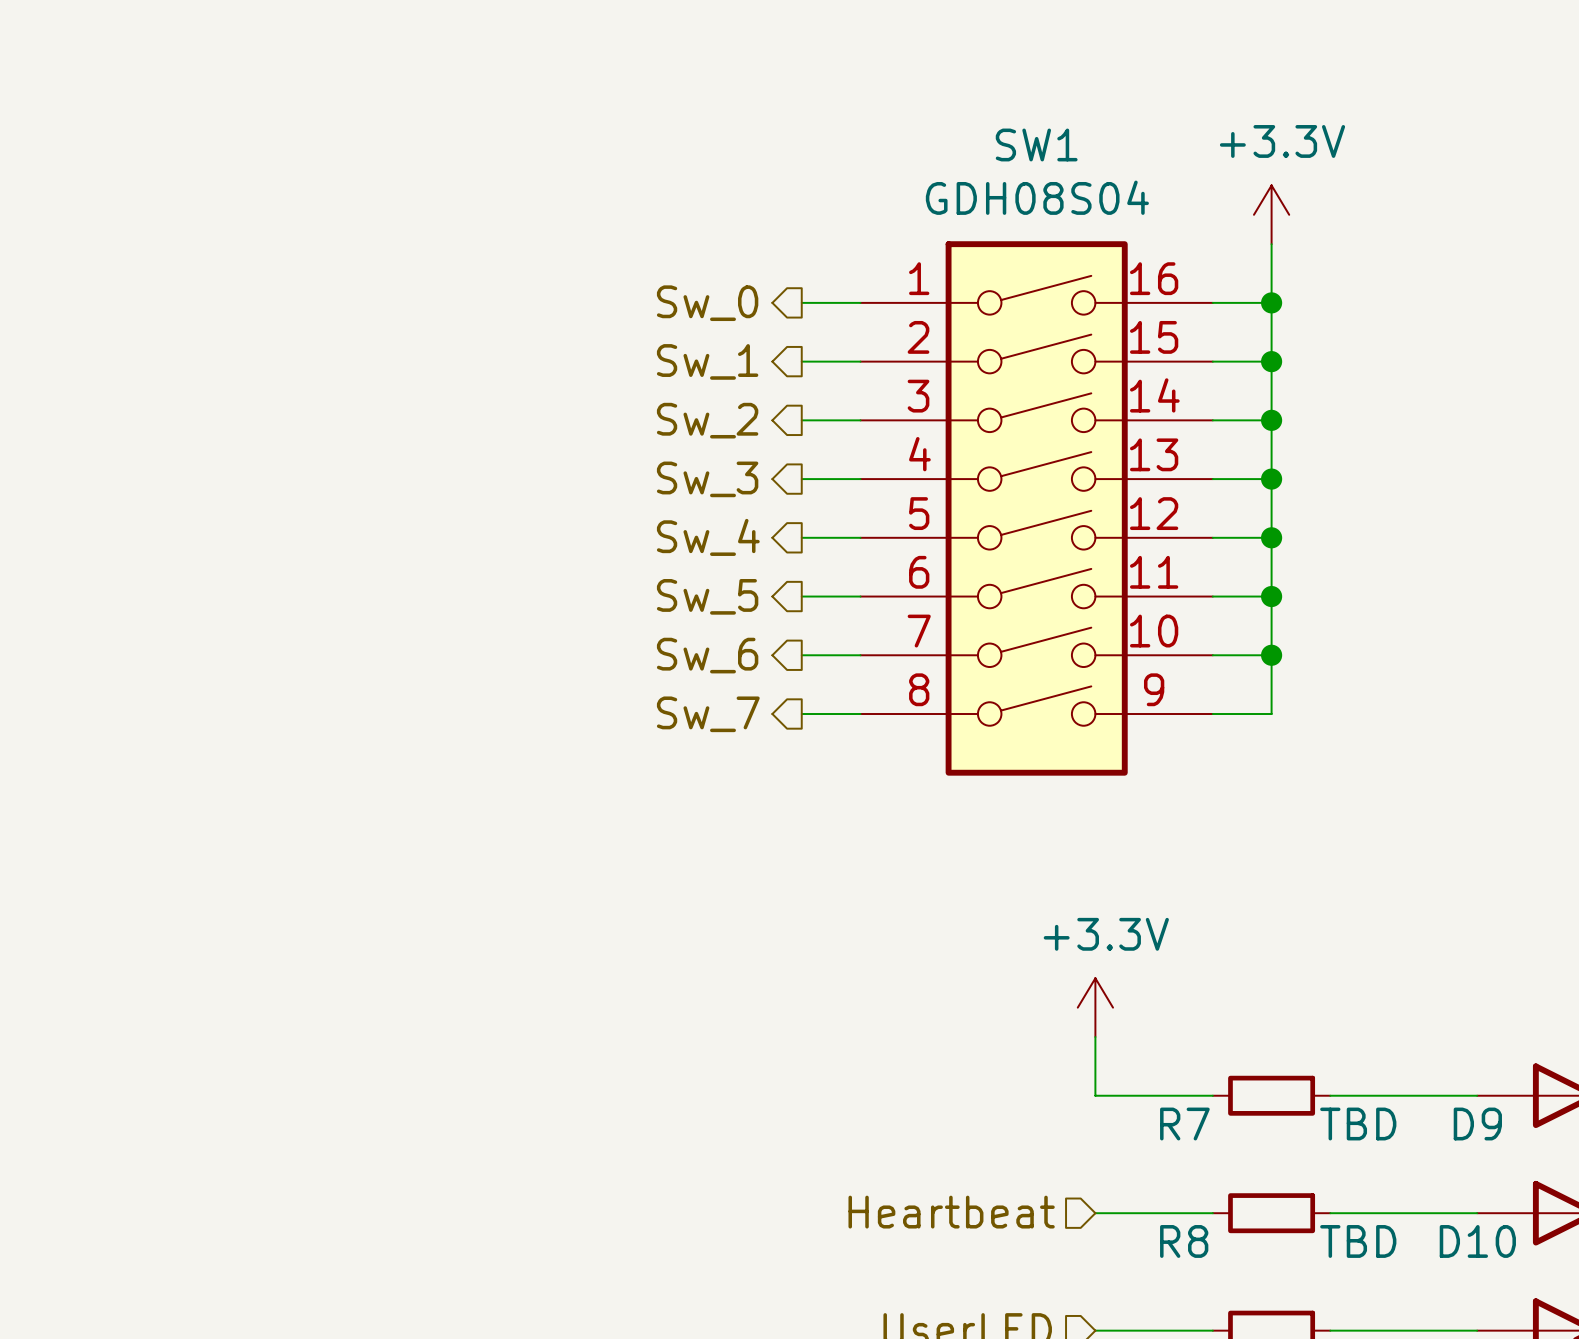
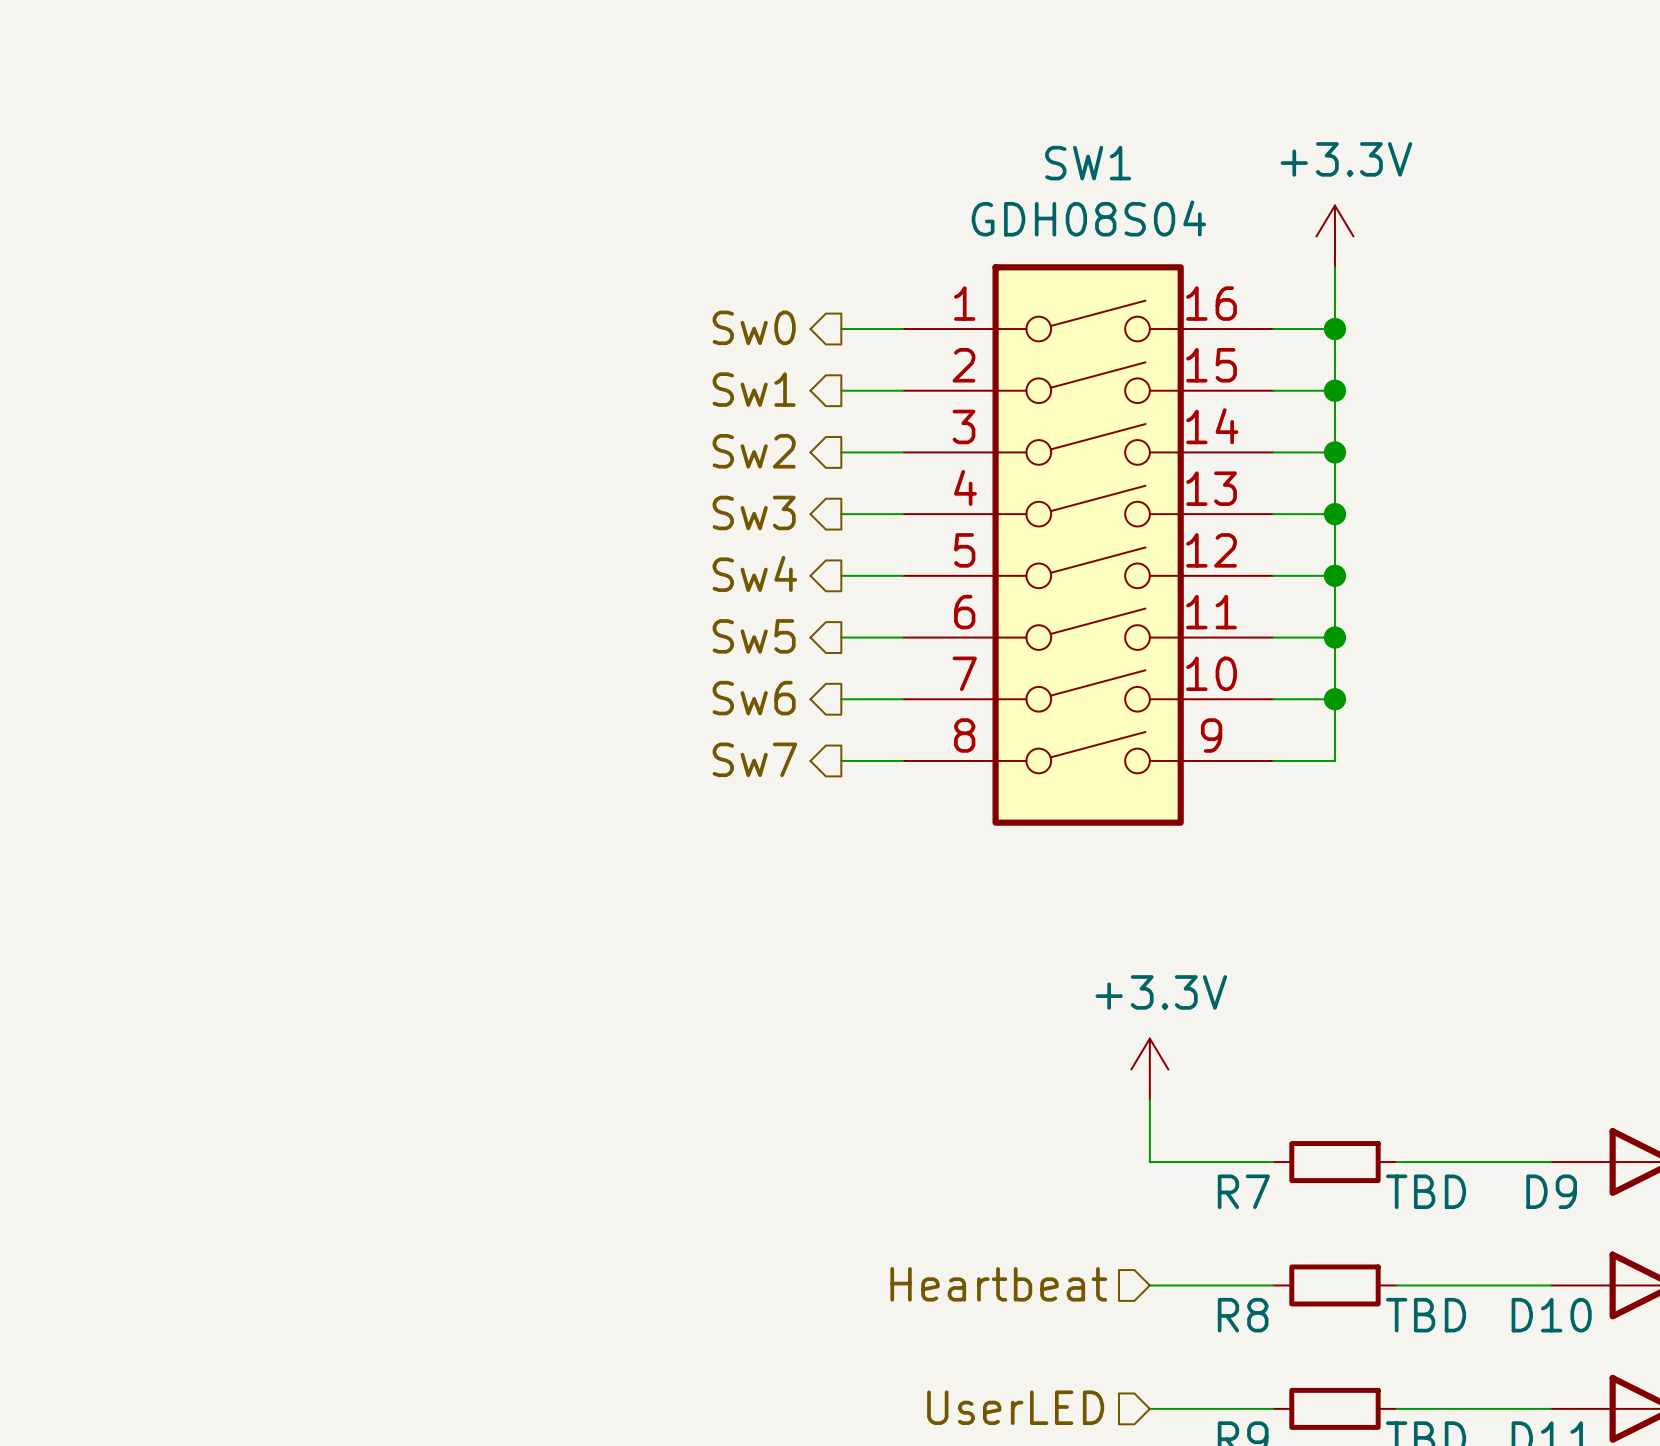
hierarchical label: Sw_0 (707, 303) -> Sw0 (754, 327)
hierarchical label: Sw_1 (707, 361) -> Sw1 (754, 389)
hierarchical label: Sw_2 (707, 420) -> Sw2 (754, 451)
hierarchical label: Sw_3 (707, 479) -> Sw3 (754, 512)
hierarchical label: Sw_4 (708, 537) -> Sw4 (754, 573)
hierarchical label: Sw_5 (707, 596) -> Sw5 (754, 636)
hierarchical label: Sw_6 (707, 655) -> Sw6 (754, 698)
hierarchical label: Sw_7 (708, 714) -> Sw7 (754, 759)

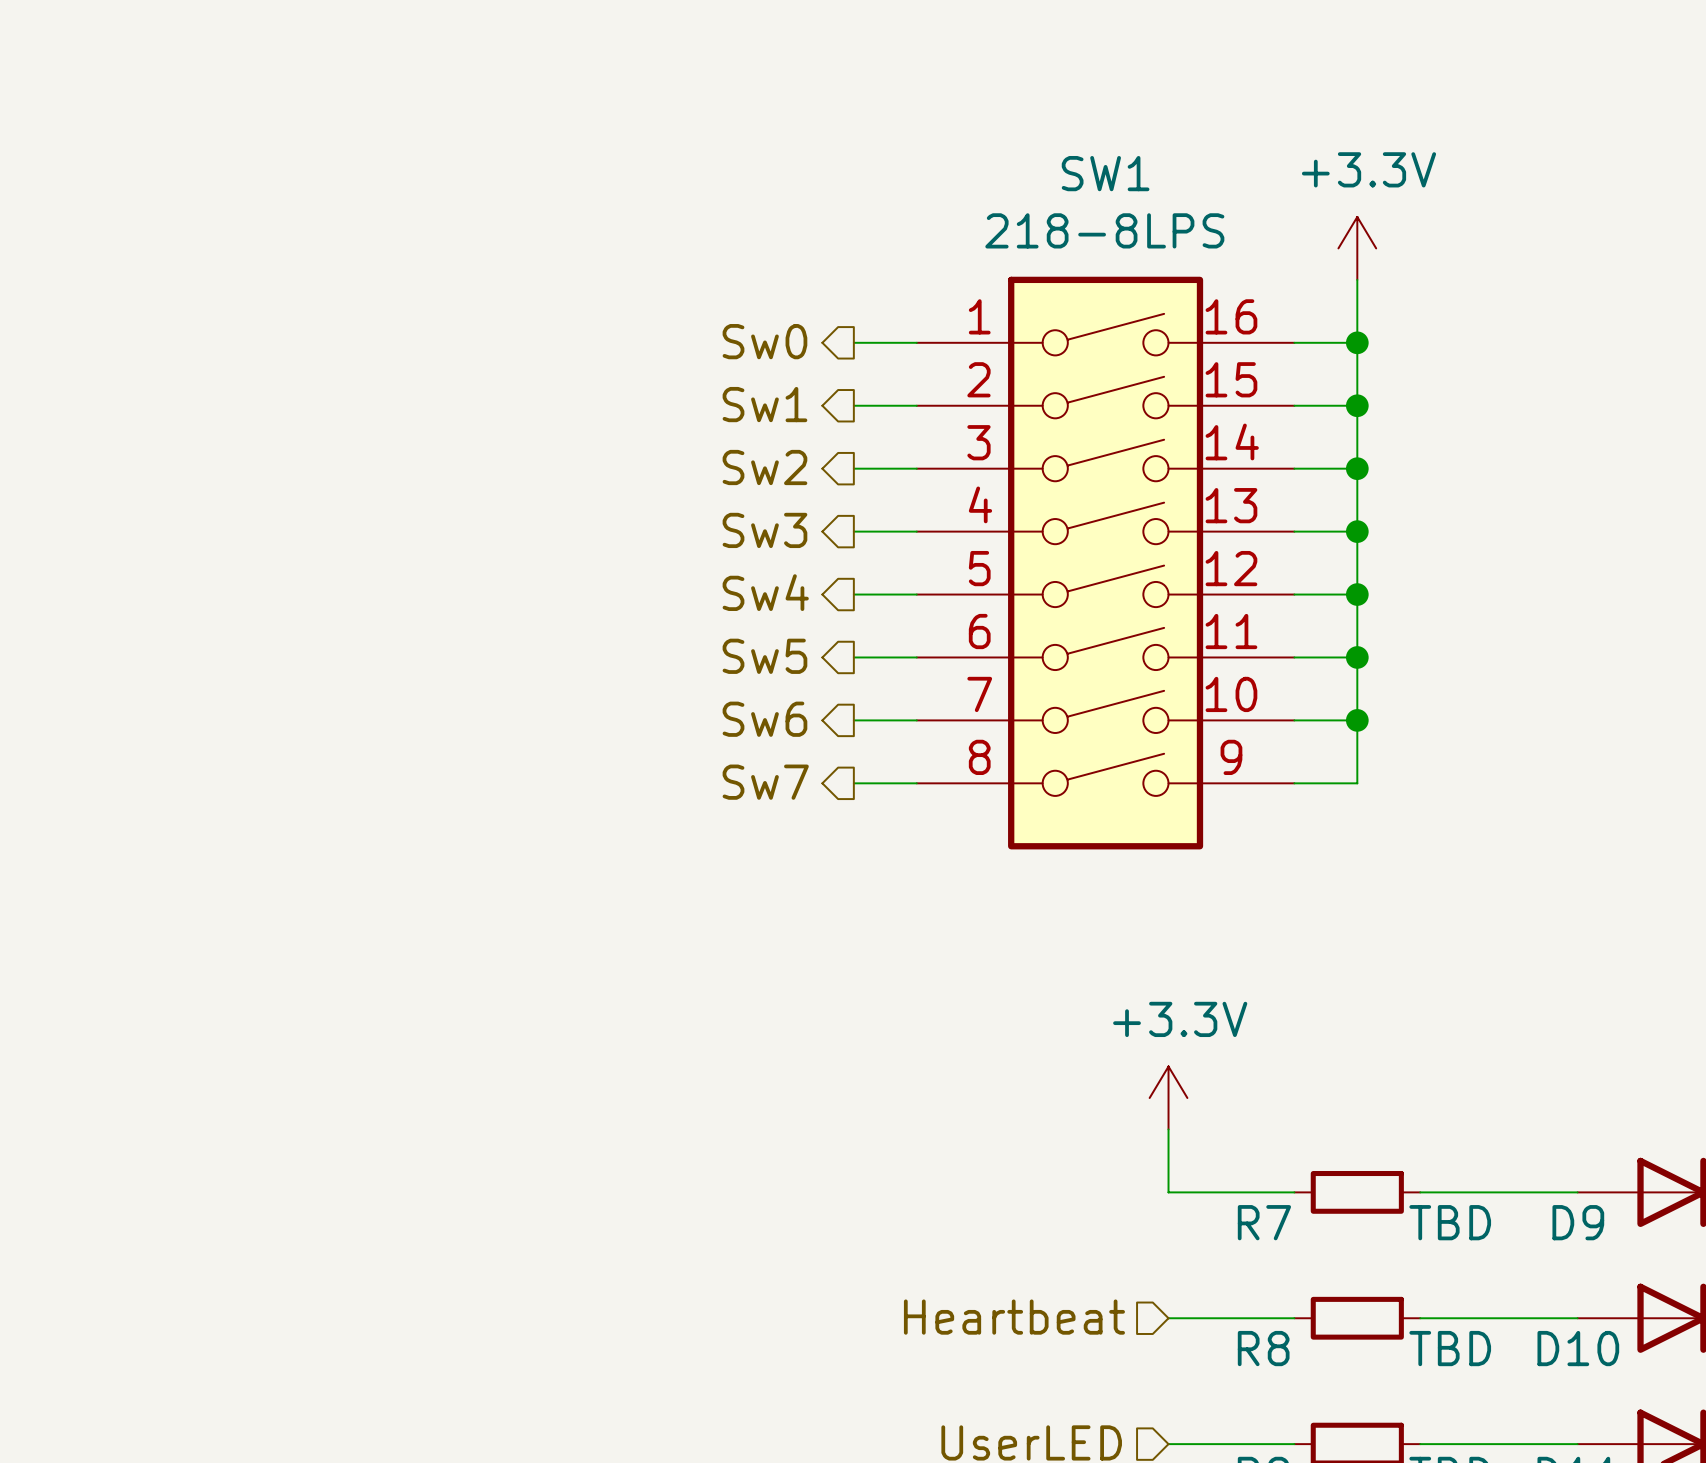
SW1 value: GDH08S04 (1088, 218) -> 218-8LPS (1104, 230)

